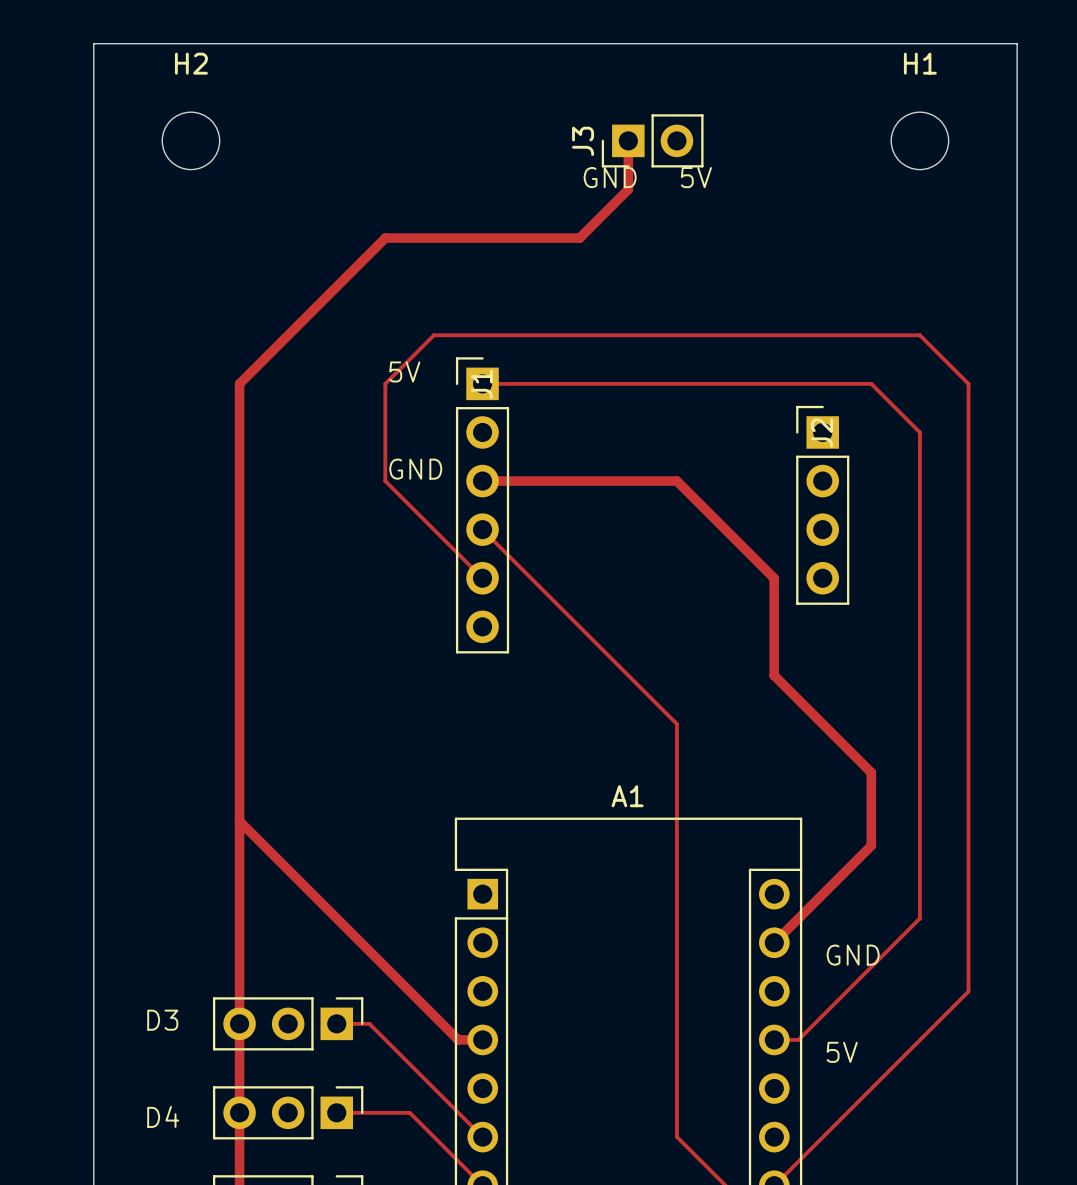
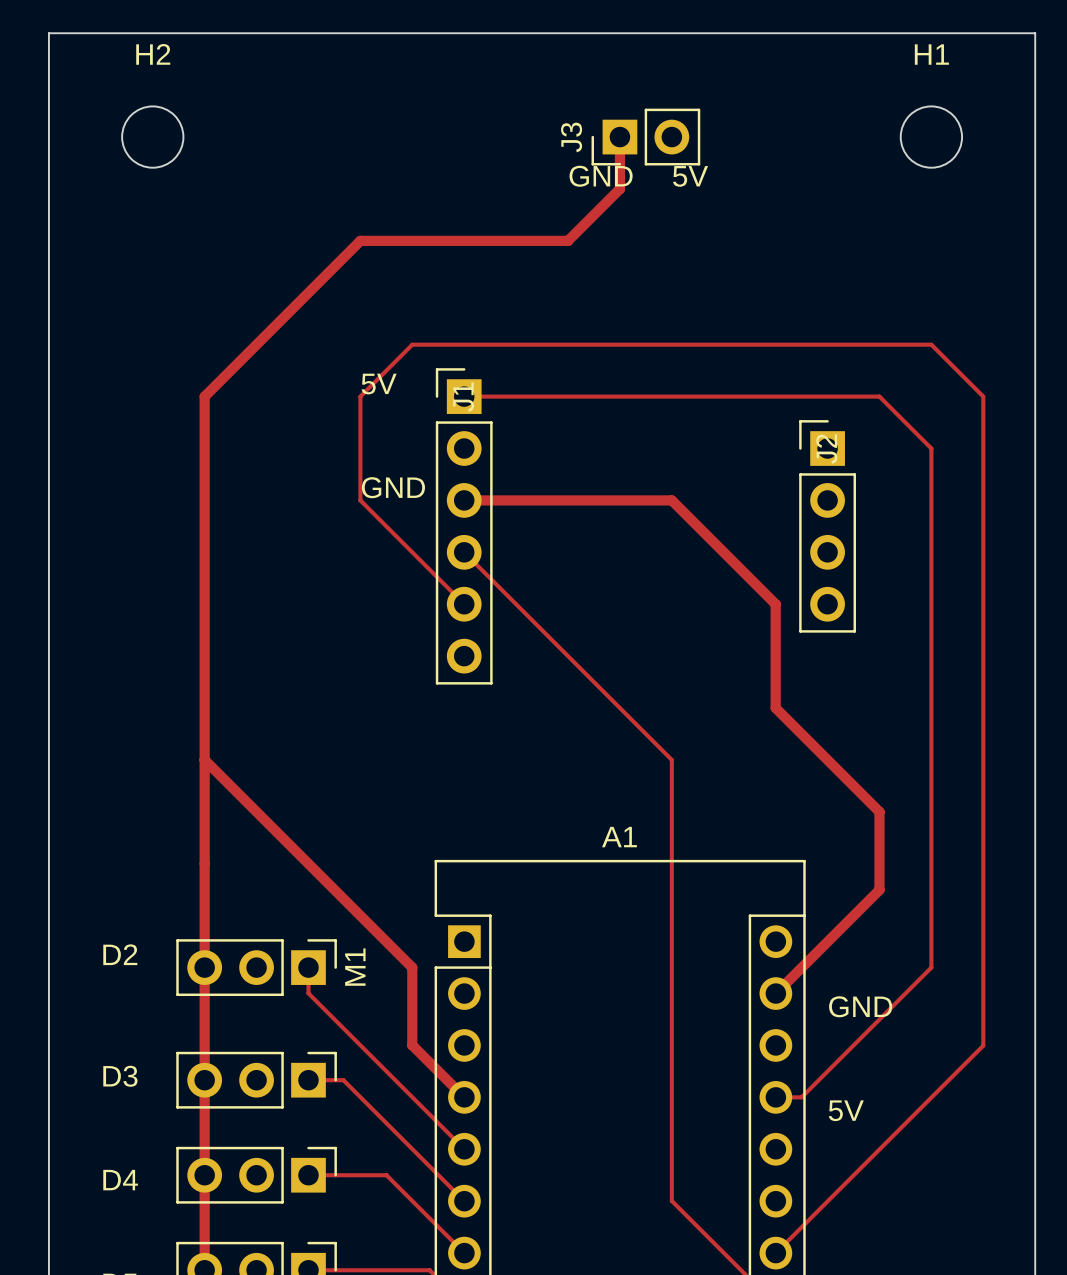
track: (239, 821) (458, 1039) (482, 1039) -> (204, 759) (412, 967) (412, 1045) (464, 1097)
text: none -> D2 (120, 954)
M1: none -> (256, 967)
track: none -> (308, 967) (308, 993) (464, 1149)

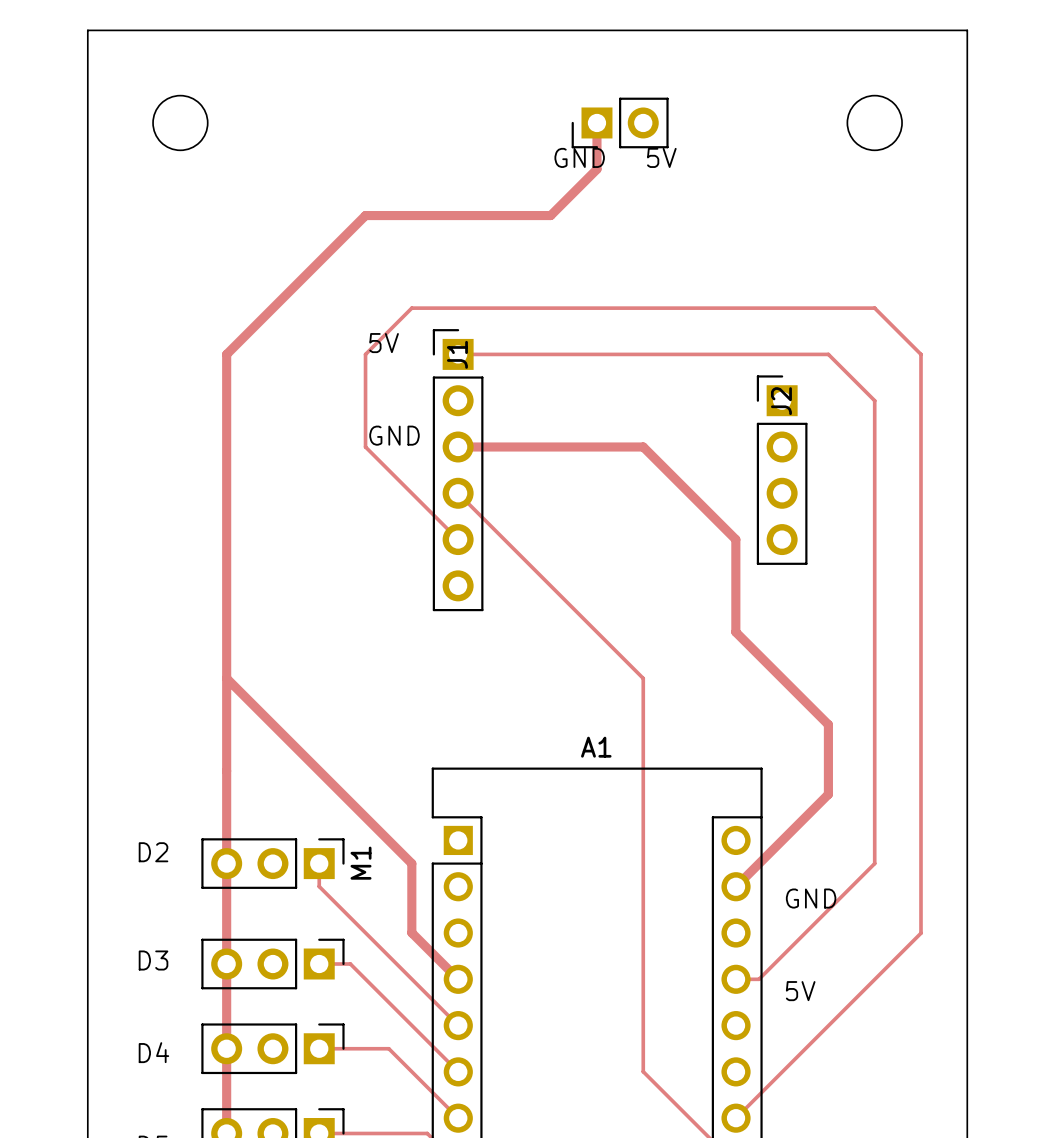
H2 name: H2 (153, 54) -> none
H1 name: H1 (931, 54) -> none
J3 name: J3 (571, 137) -> none

